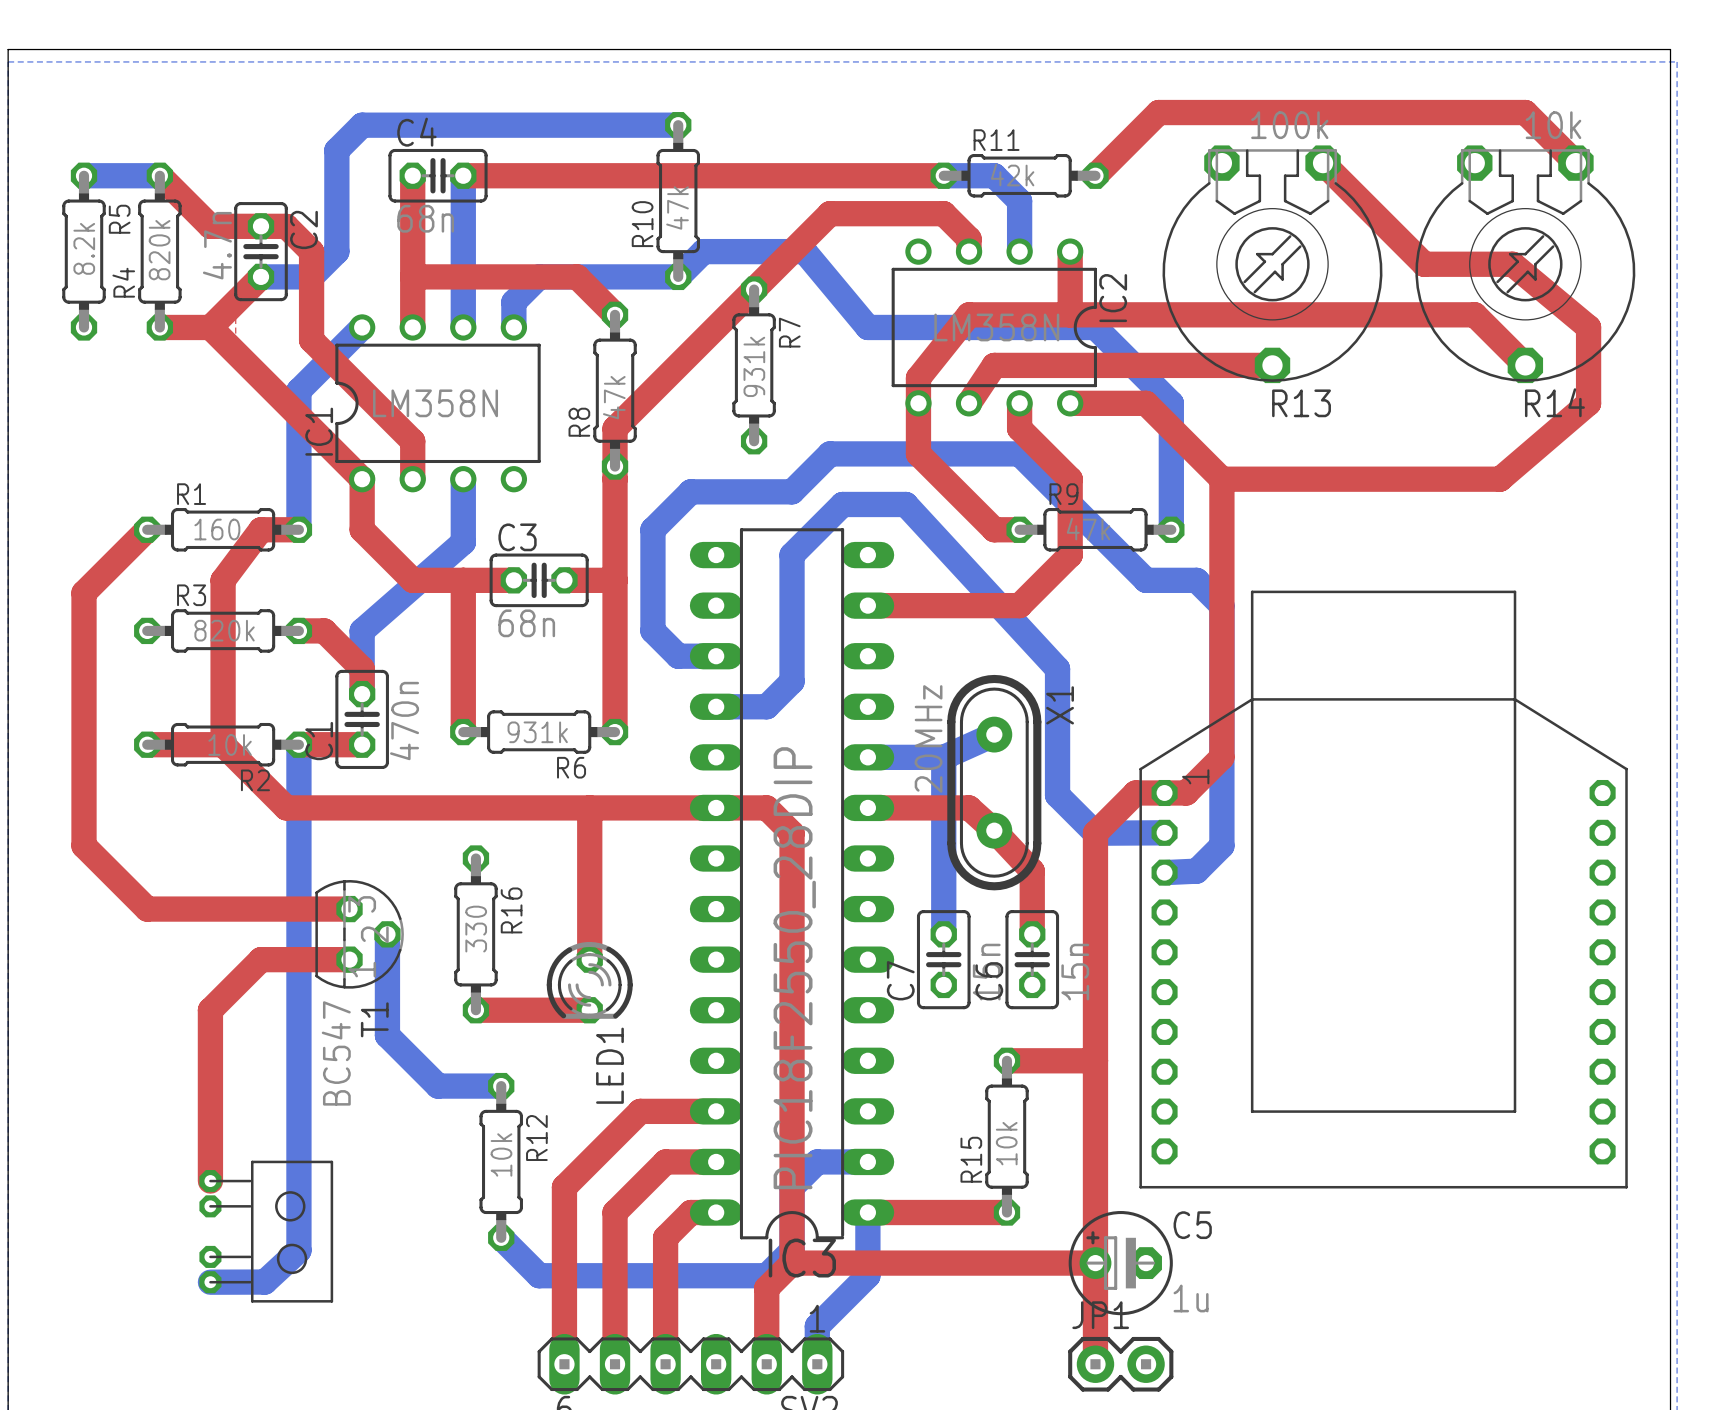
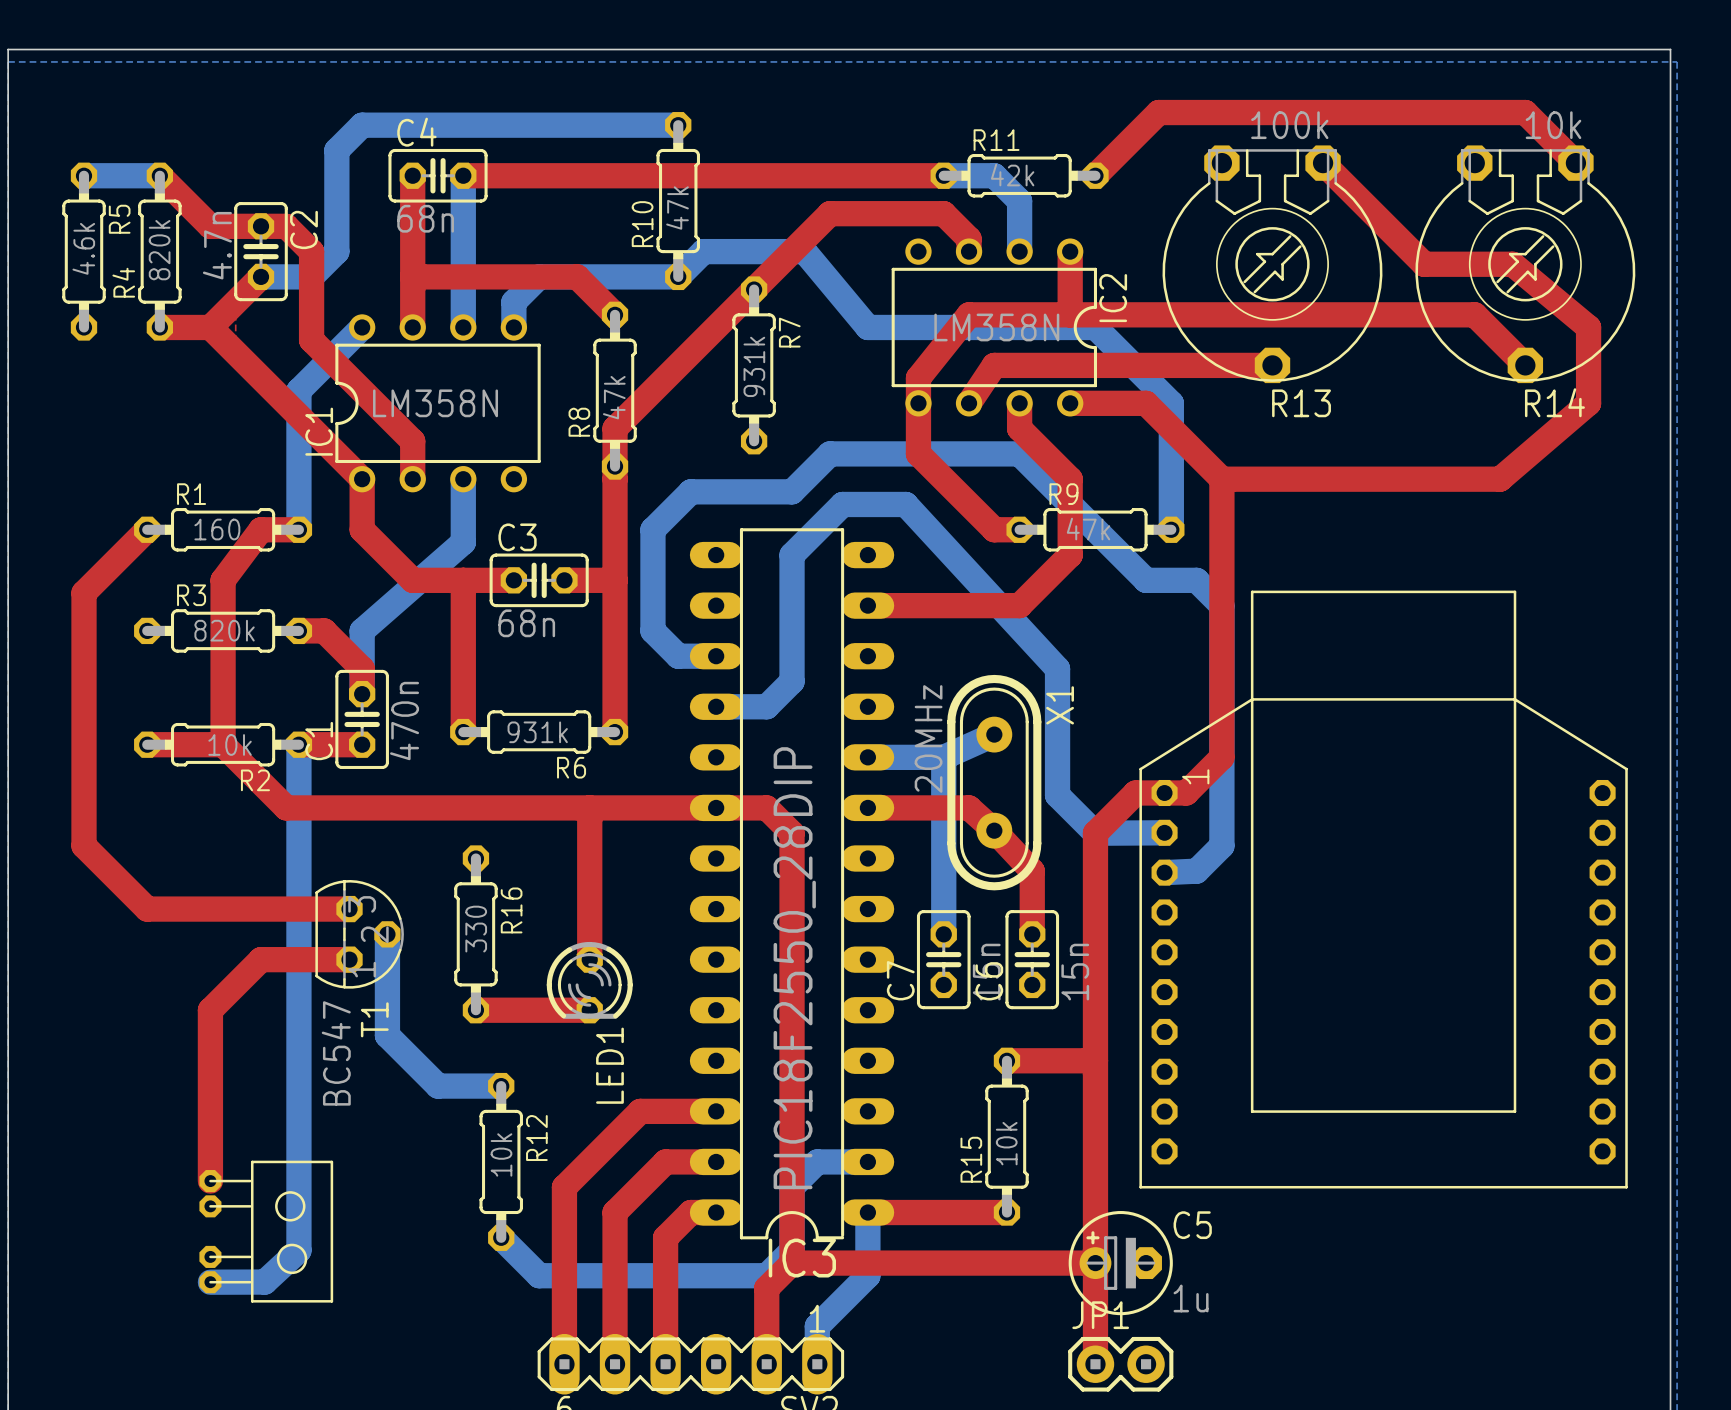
R5 value: 8.2k (84, 248) -> 4.6k (83, 248)

